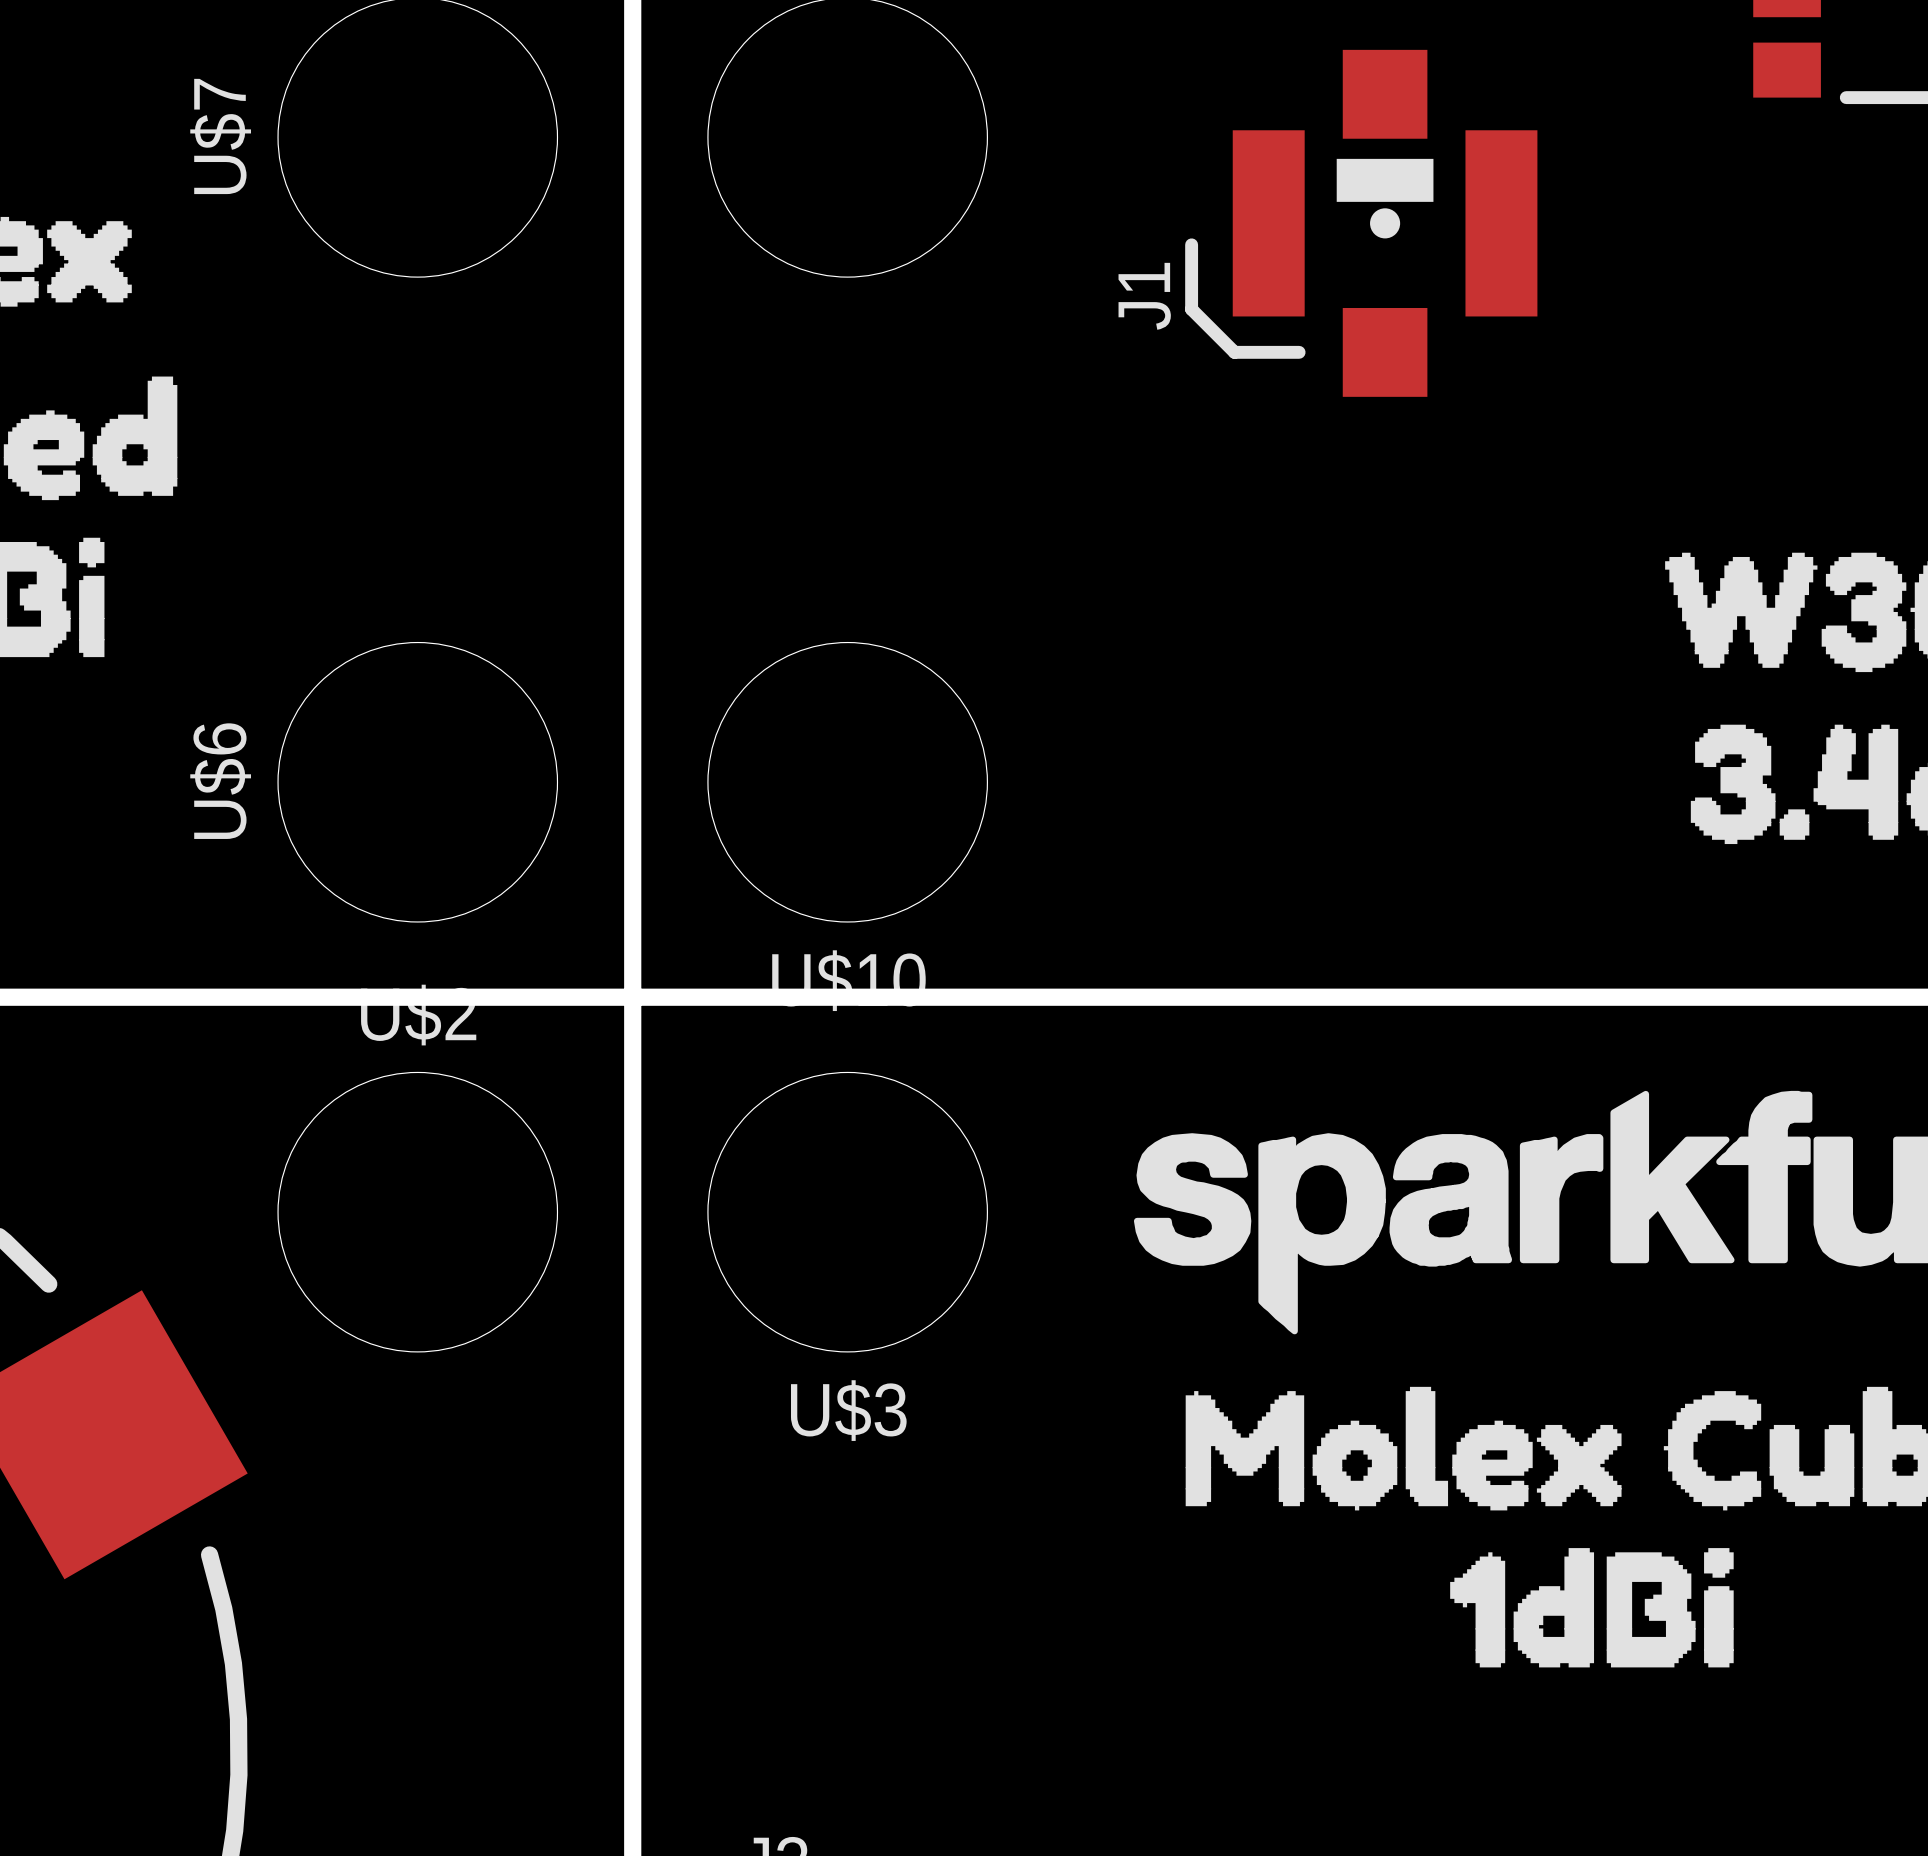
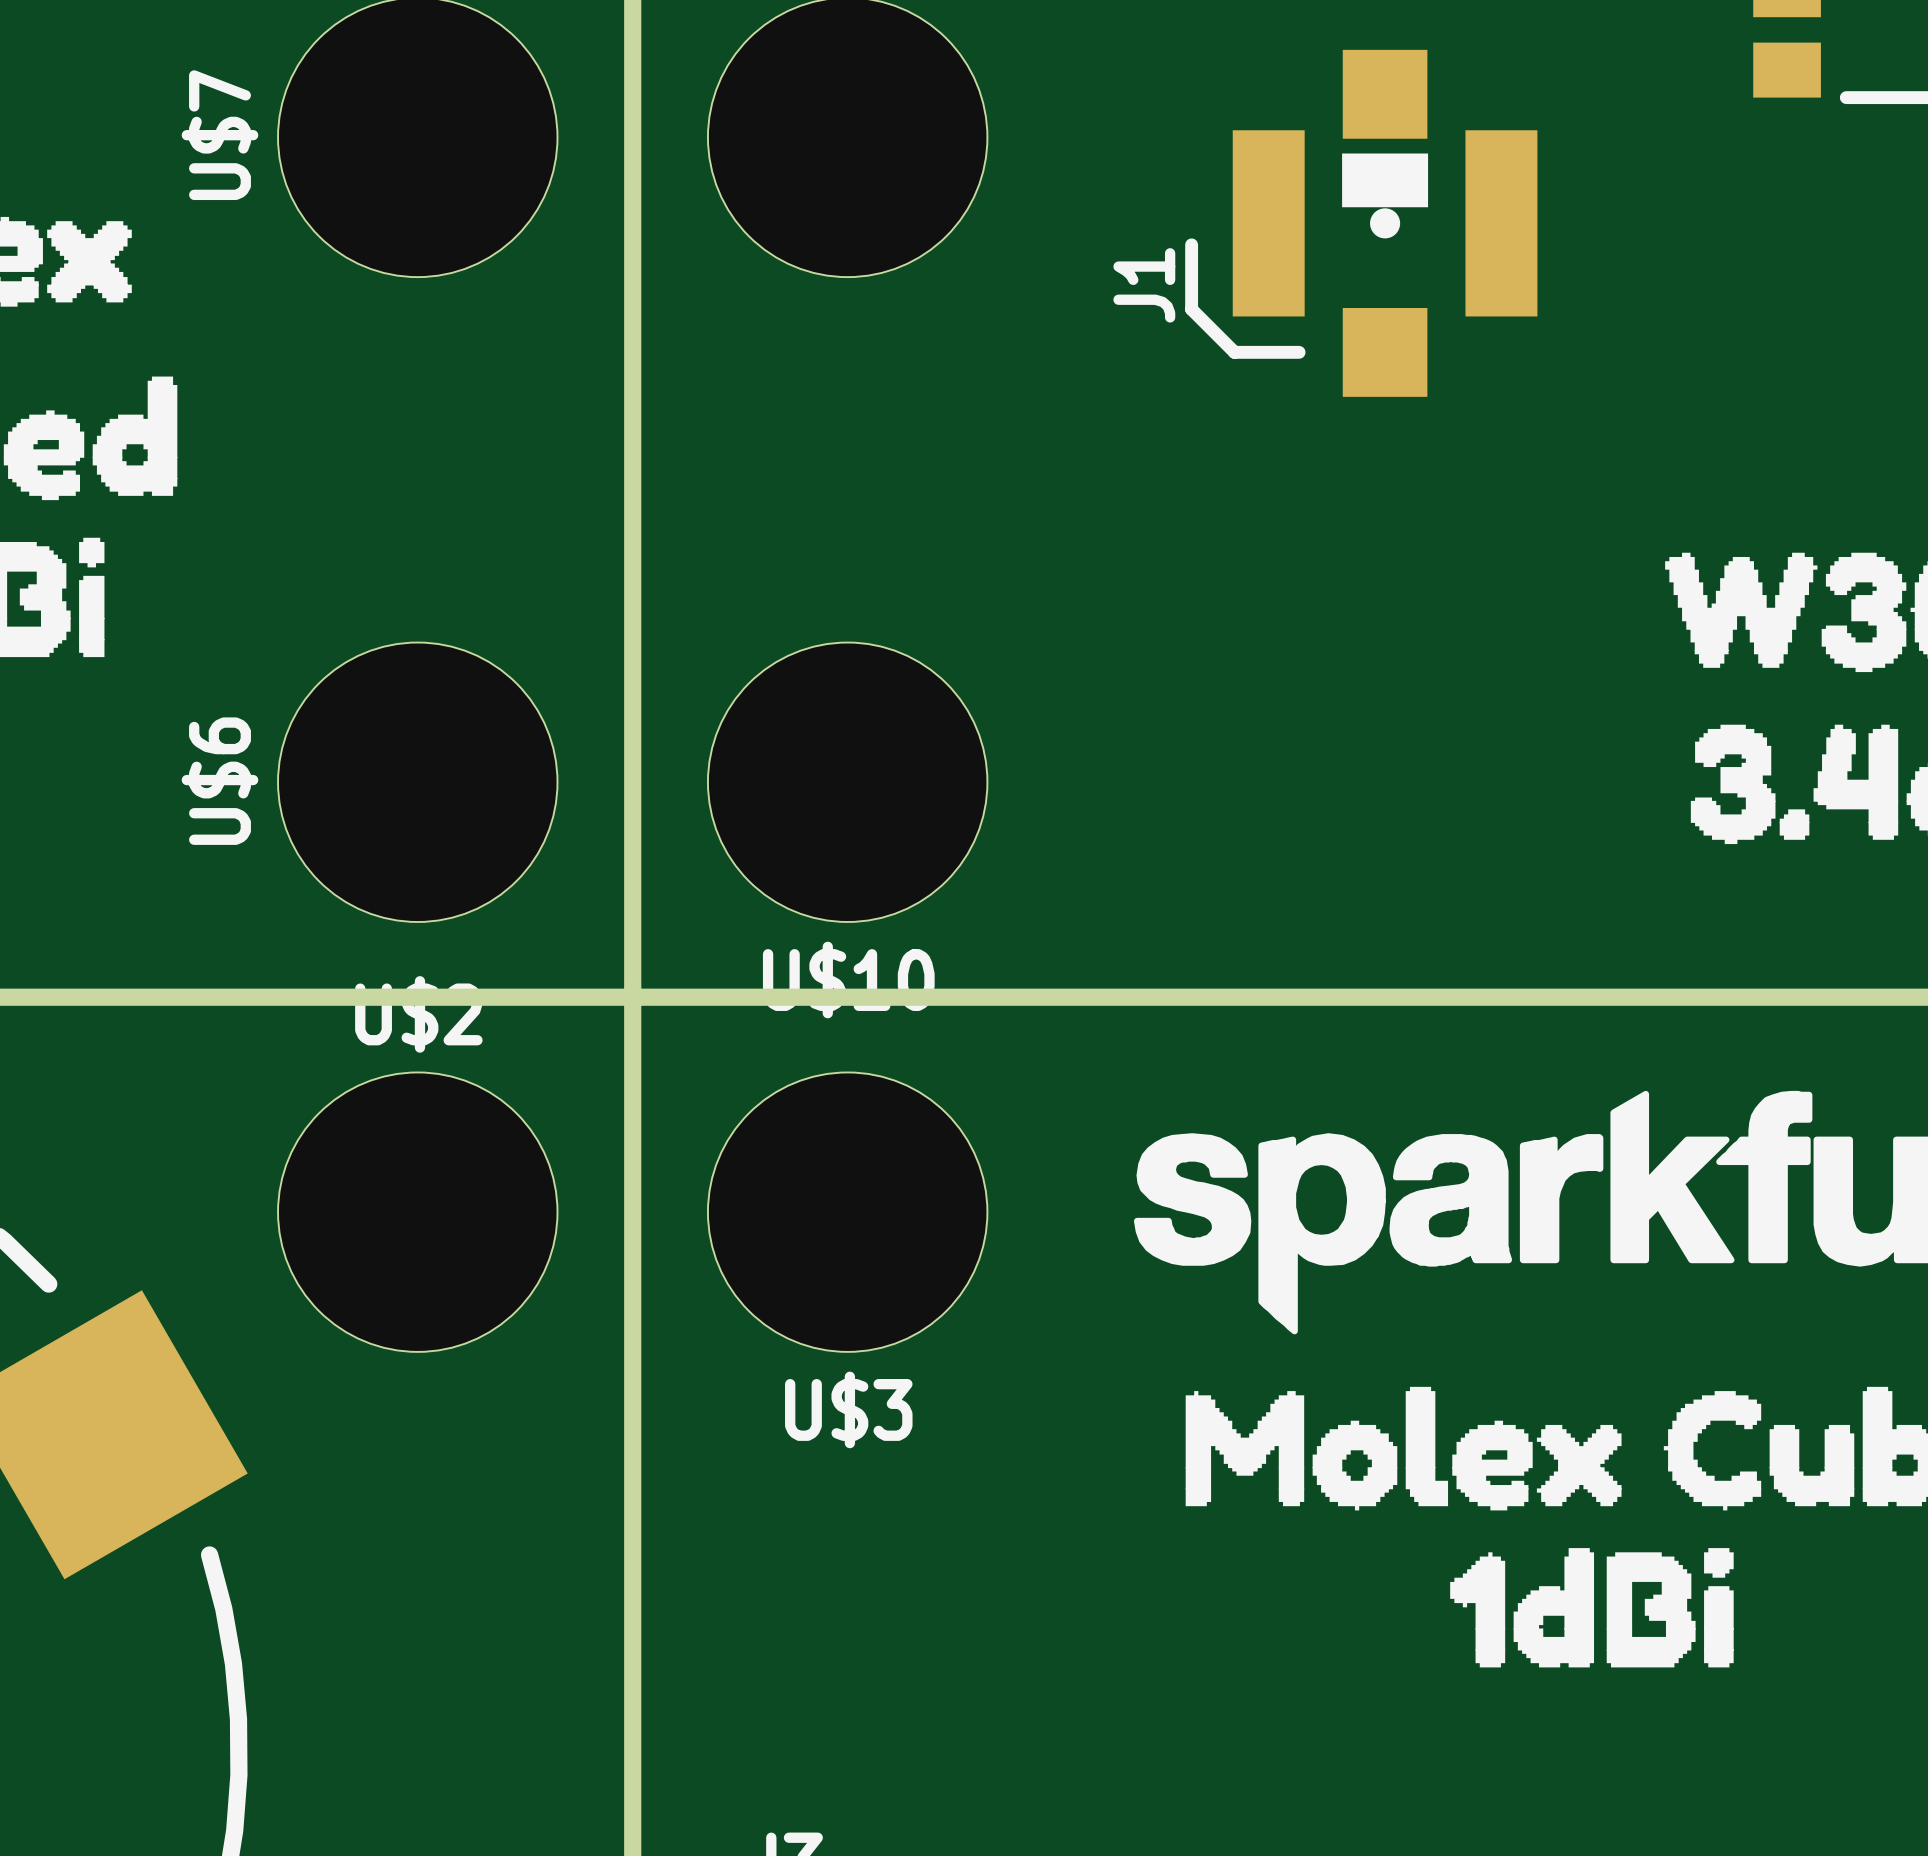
J1 footprint: [1185, 49, 1538, 397] -> [1185, 49, 1538, 397]

